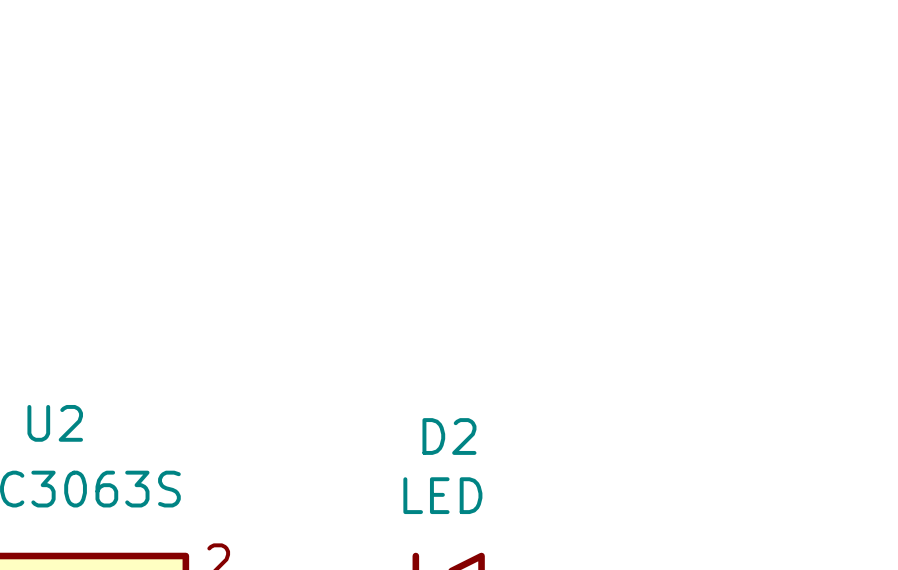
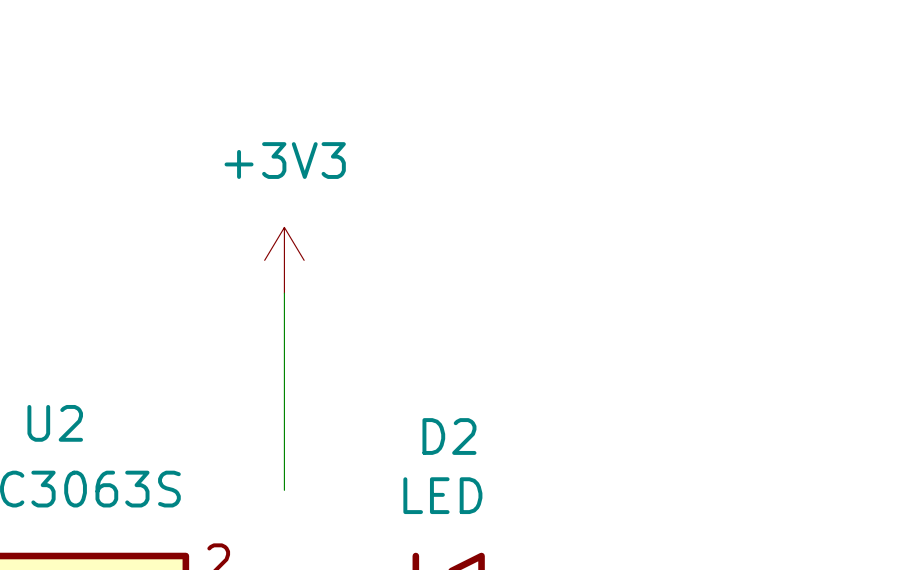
power symbol: none -> +3V3 (284, 260)
wire: none -> (284, 293) (284, 490)

